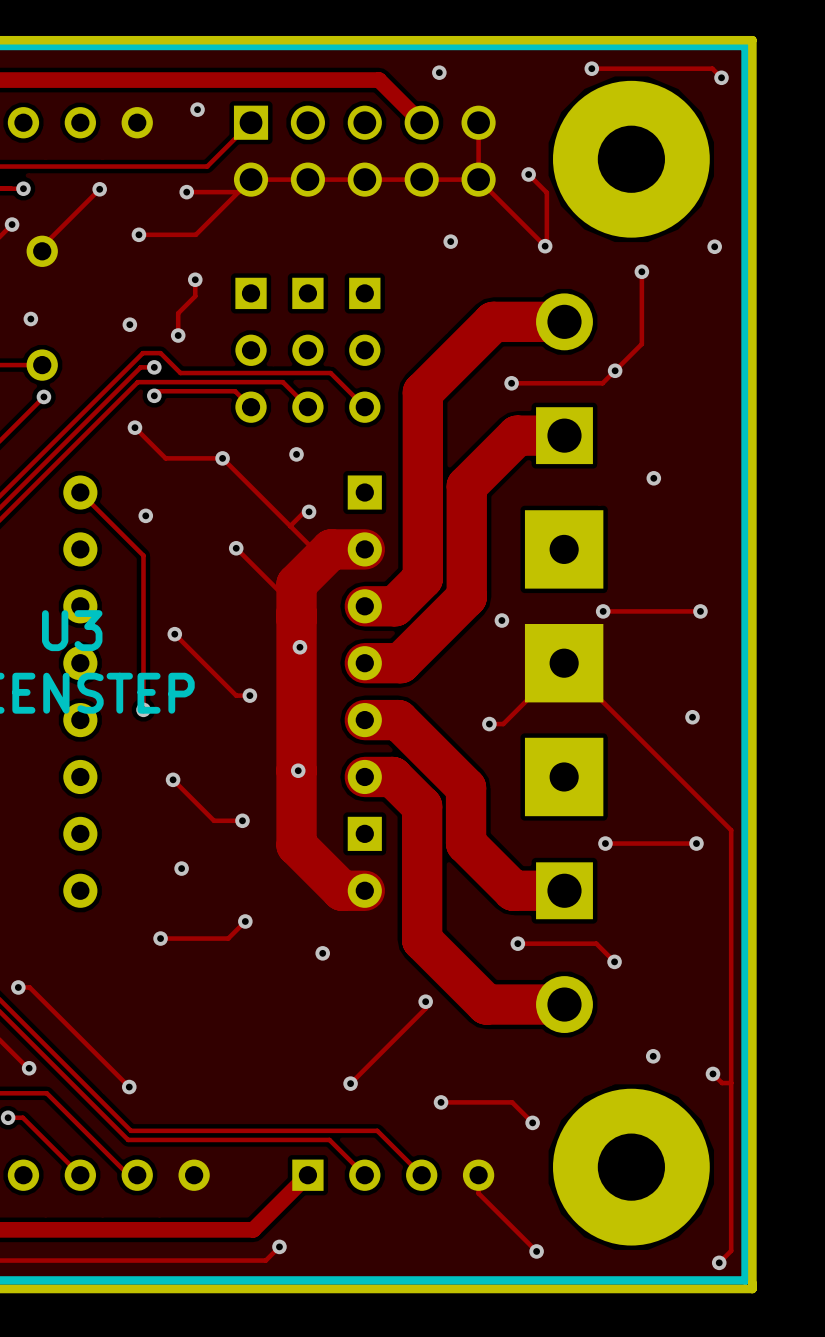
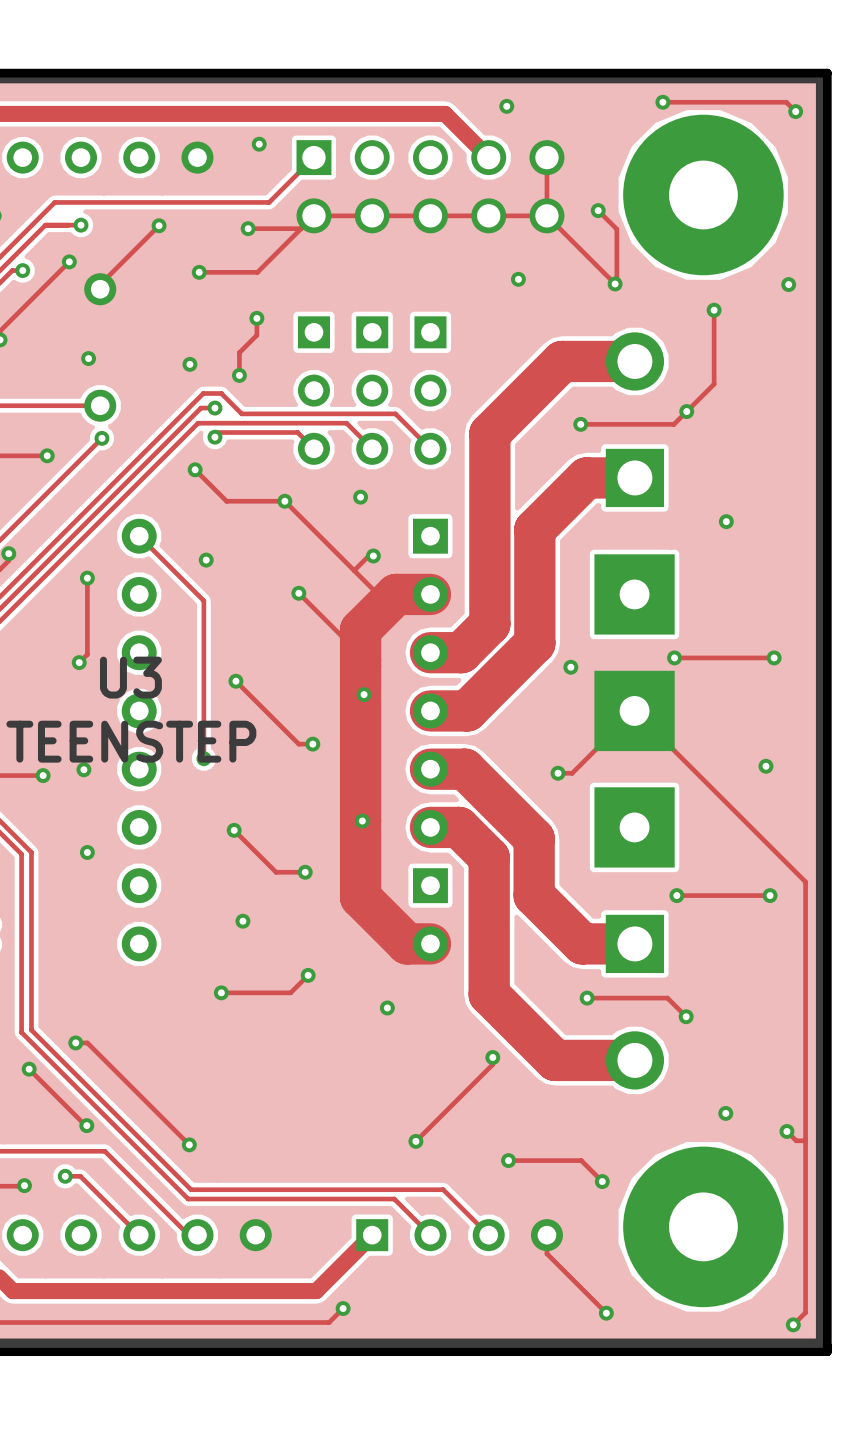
track: none -> (87, 578) (87, 654) (79, 662)
via: none -> (87, 578)
via: none -> (79, 662)
via: none -> (83, 769)
via: none -> (87, 852)

